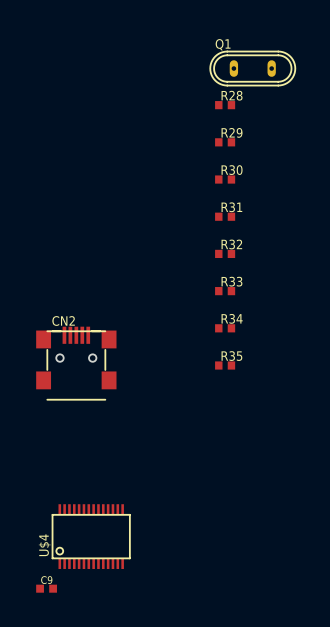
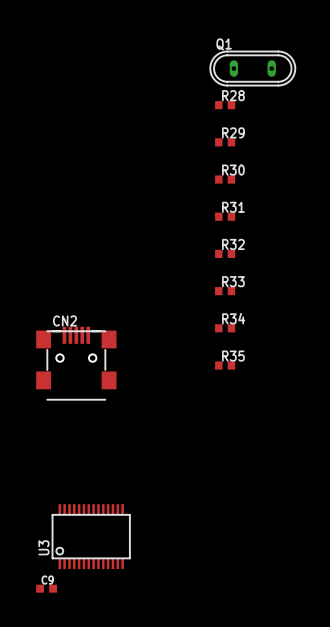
U$4 name: U$4 (44, 545) -> U3 (43, 547)

